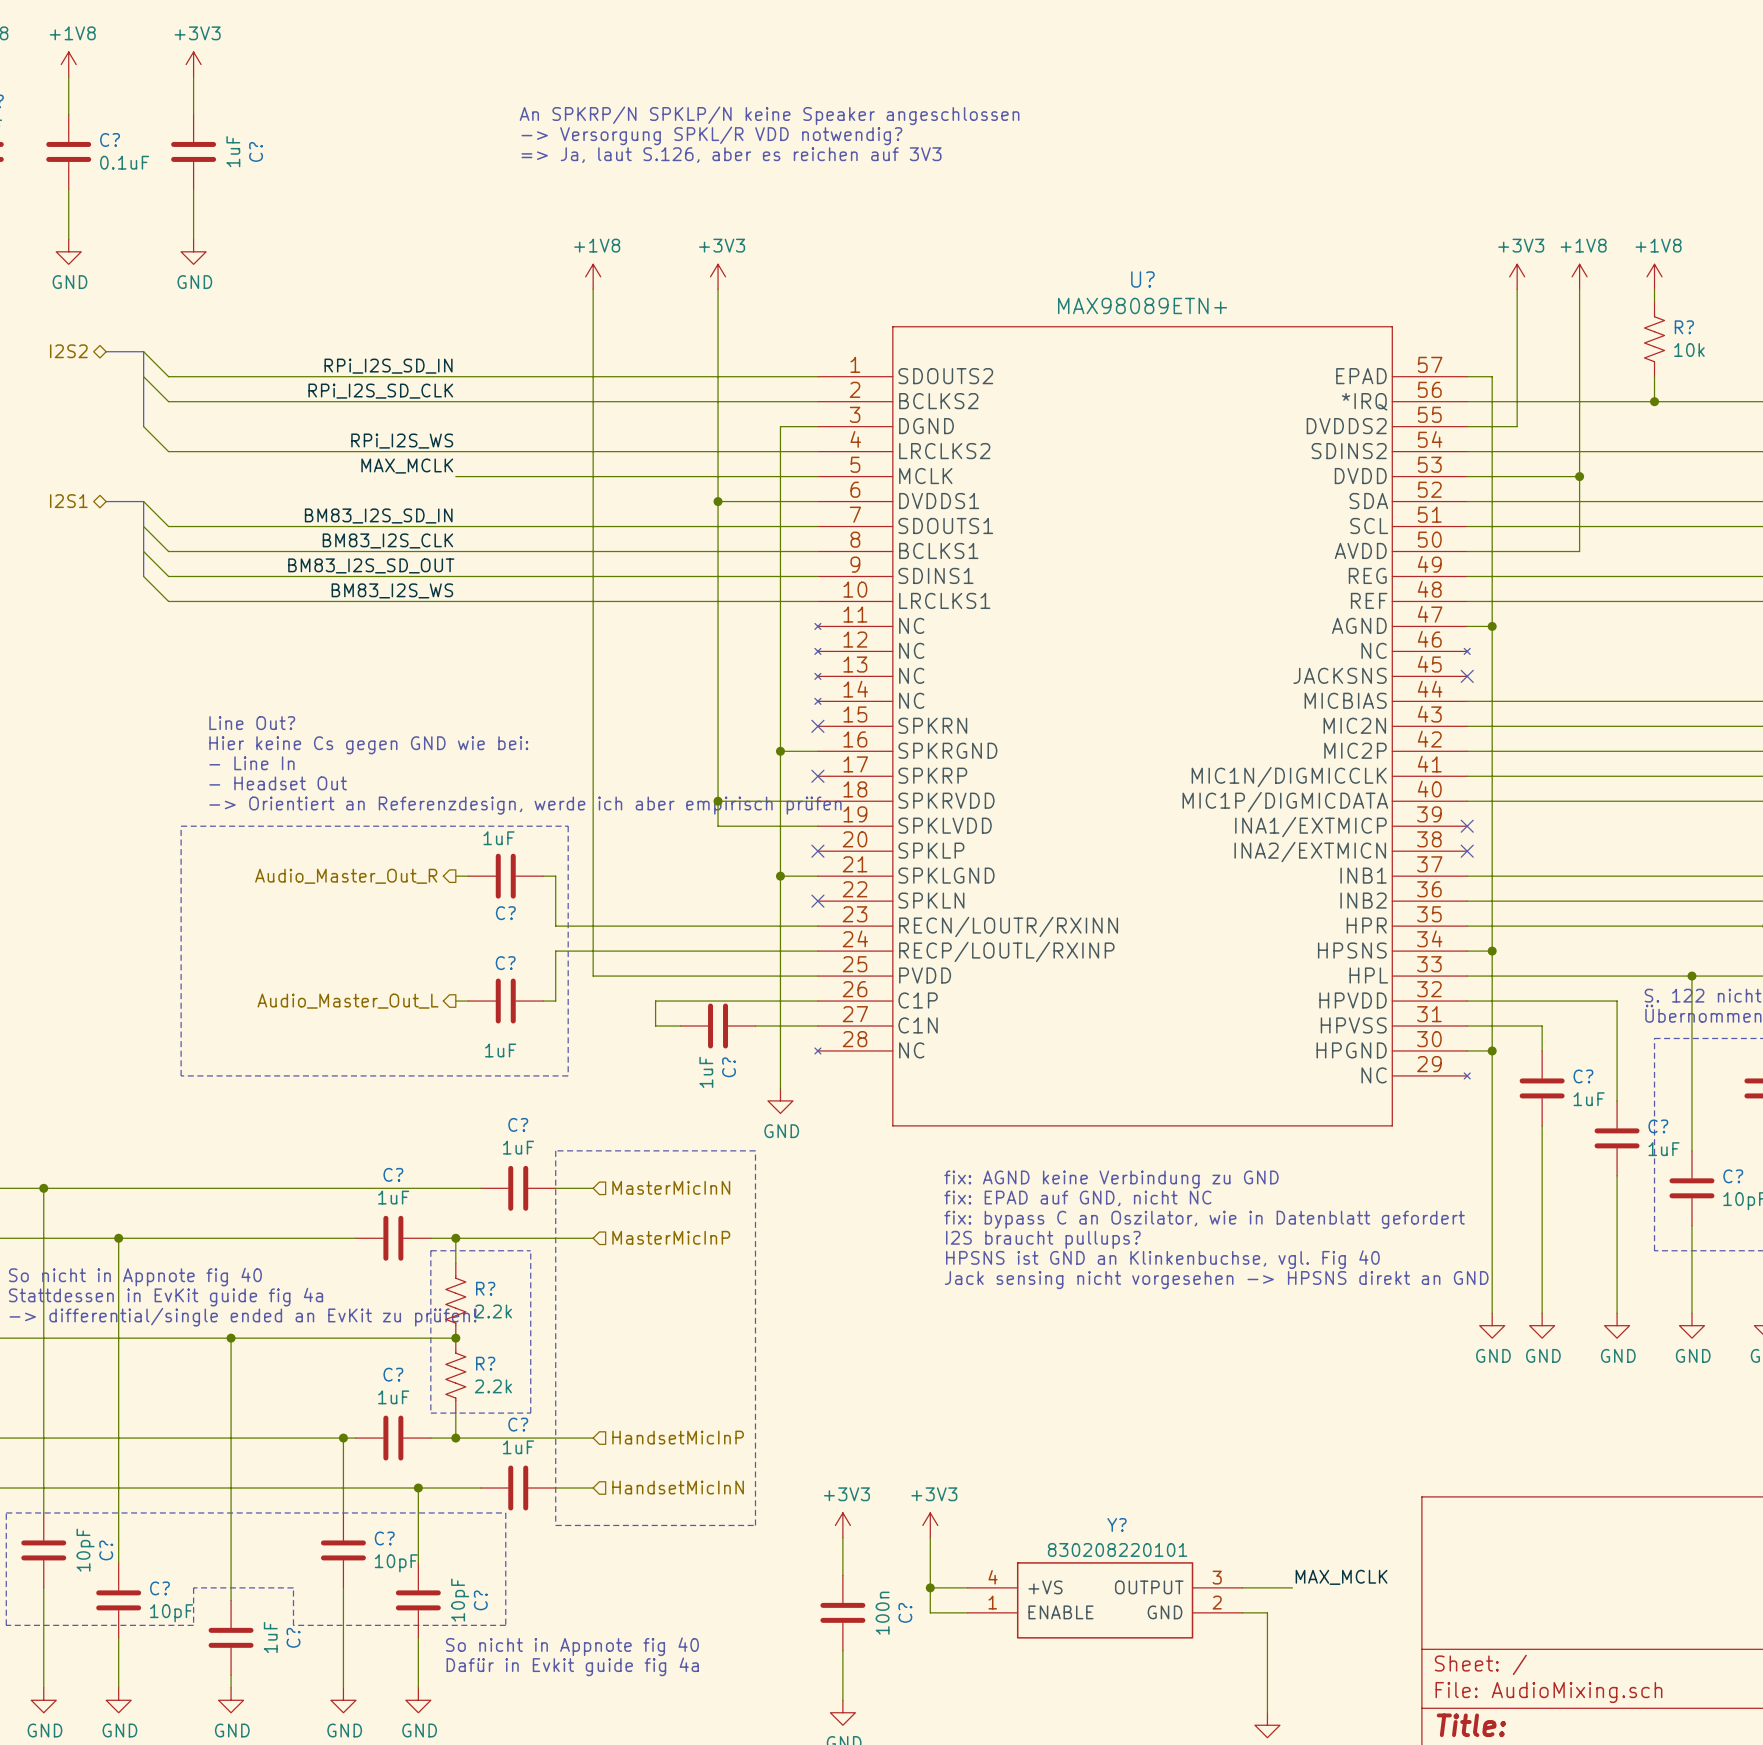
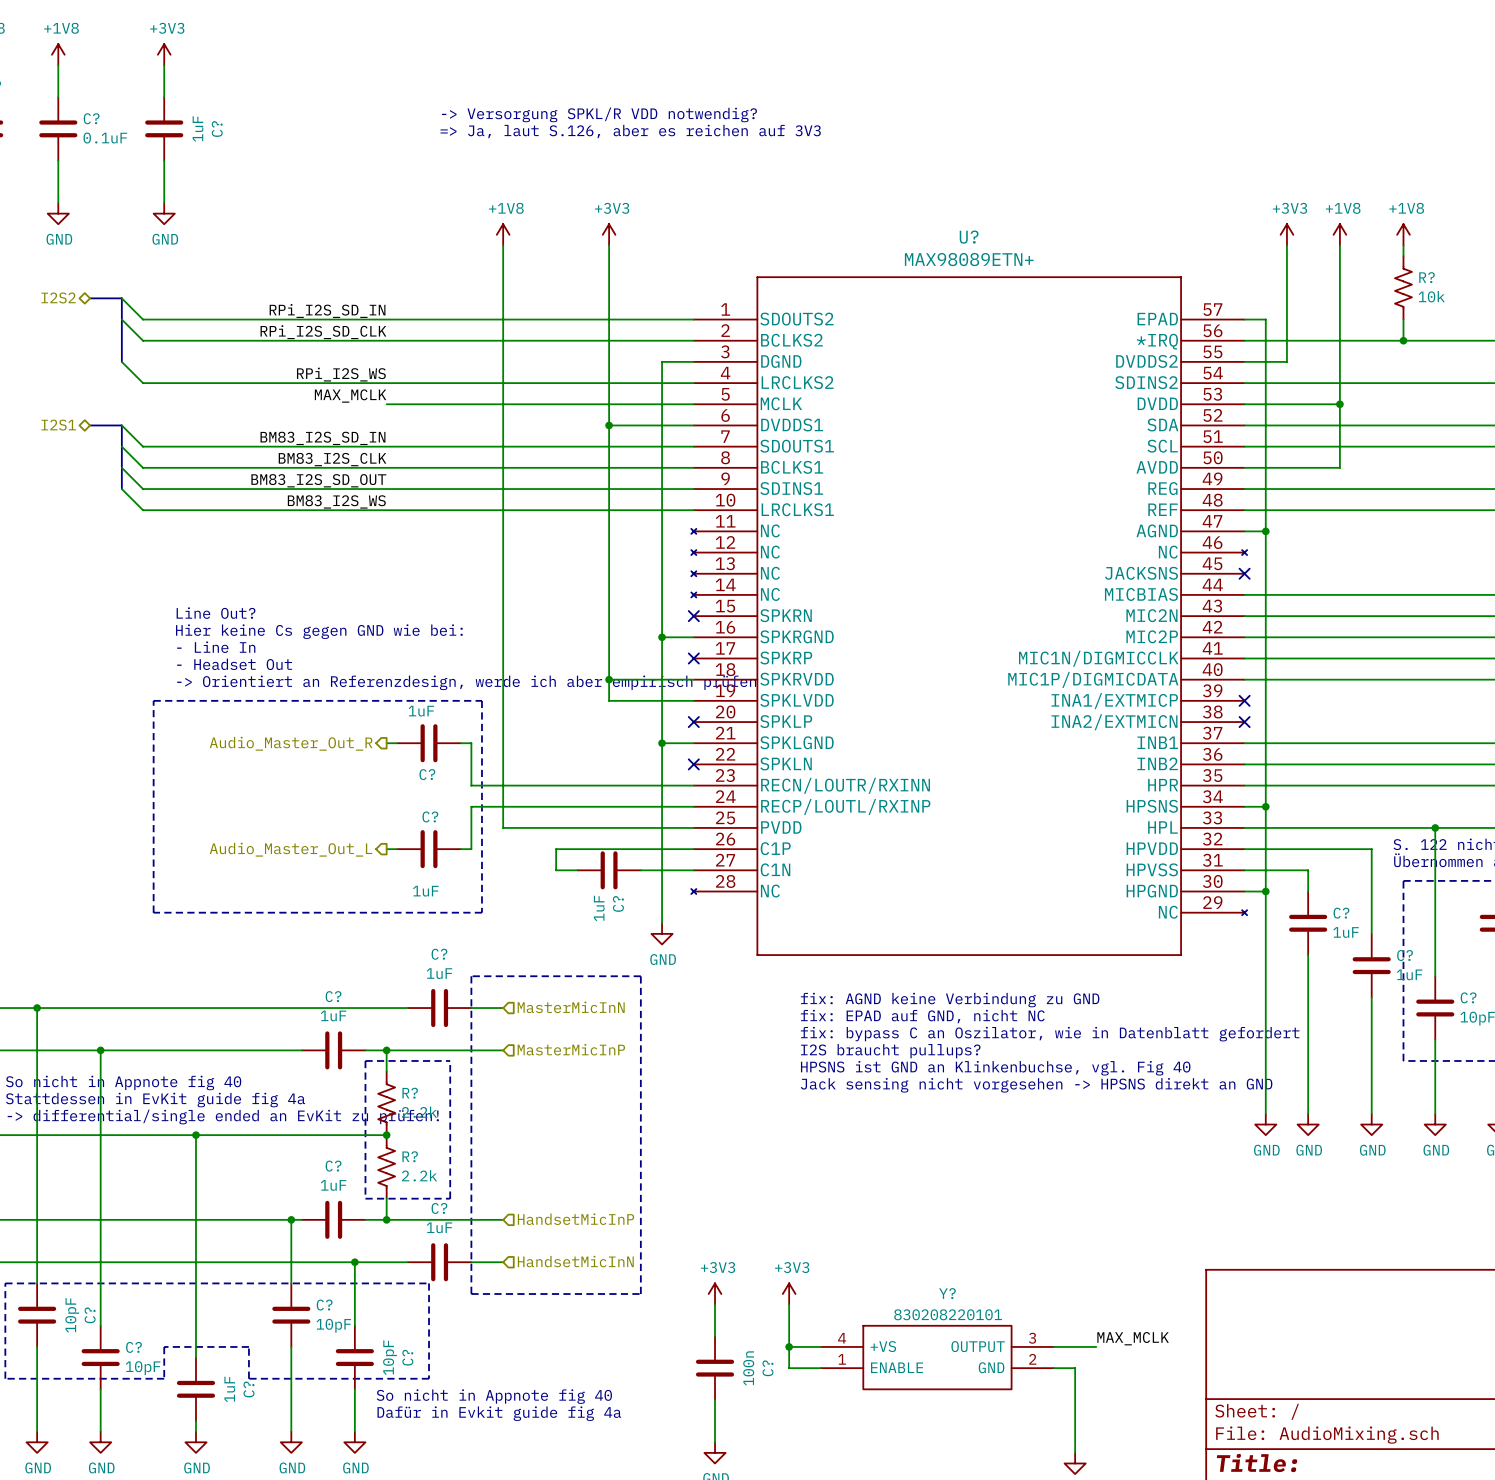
text: An SPKRP/N SPKLP/N keine Speaker angeschlossen (769, 115) -> none

